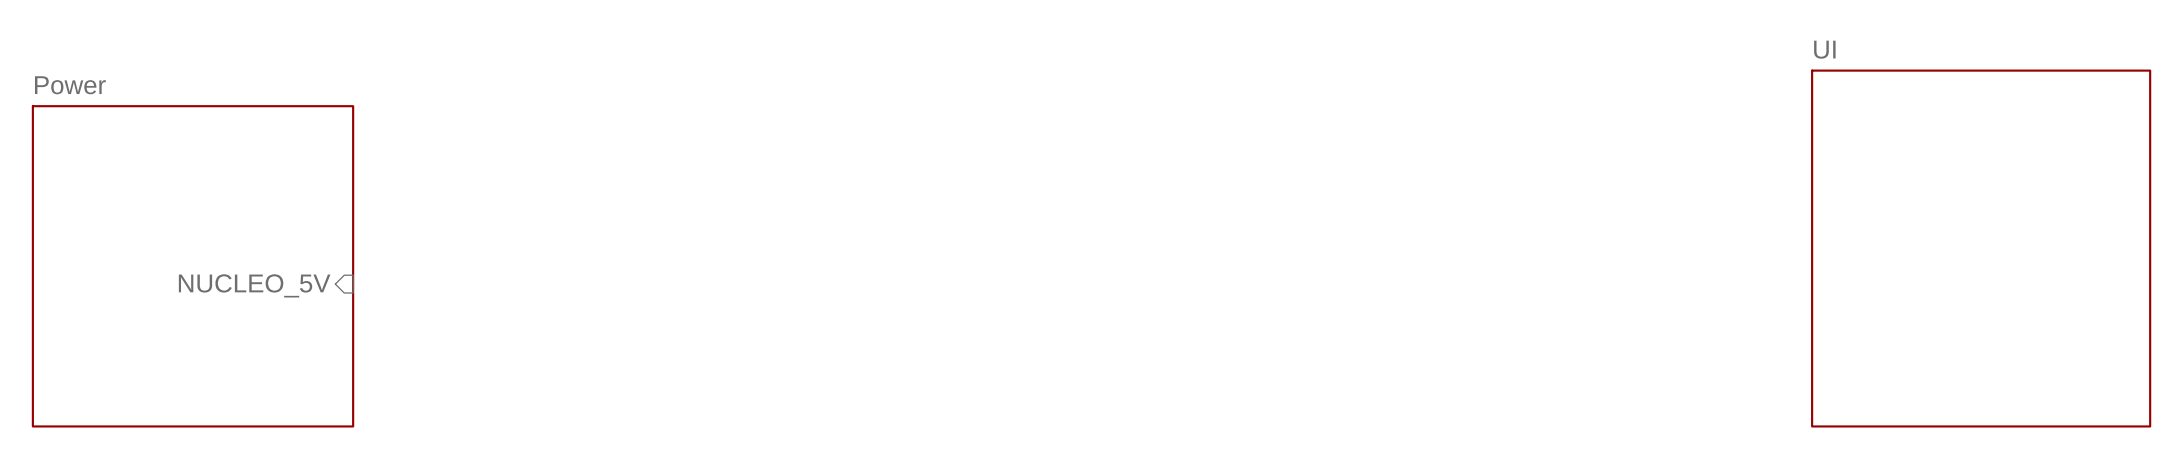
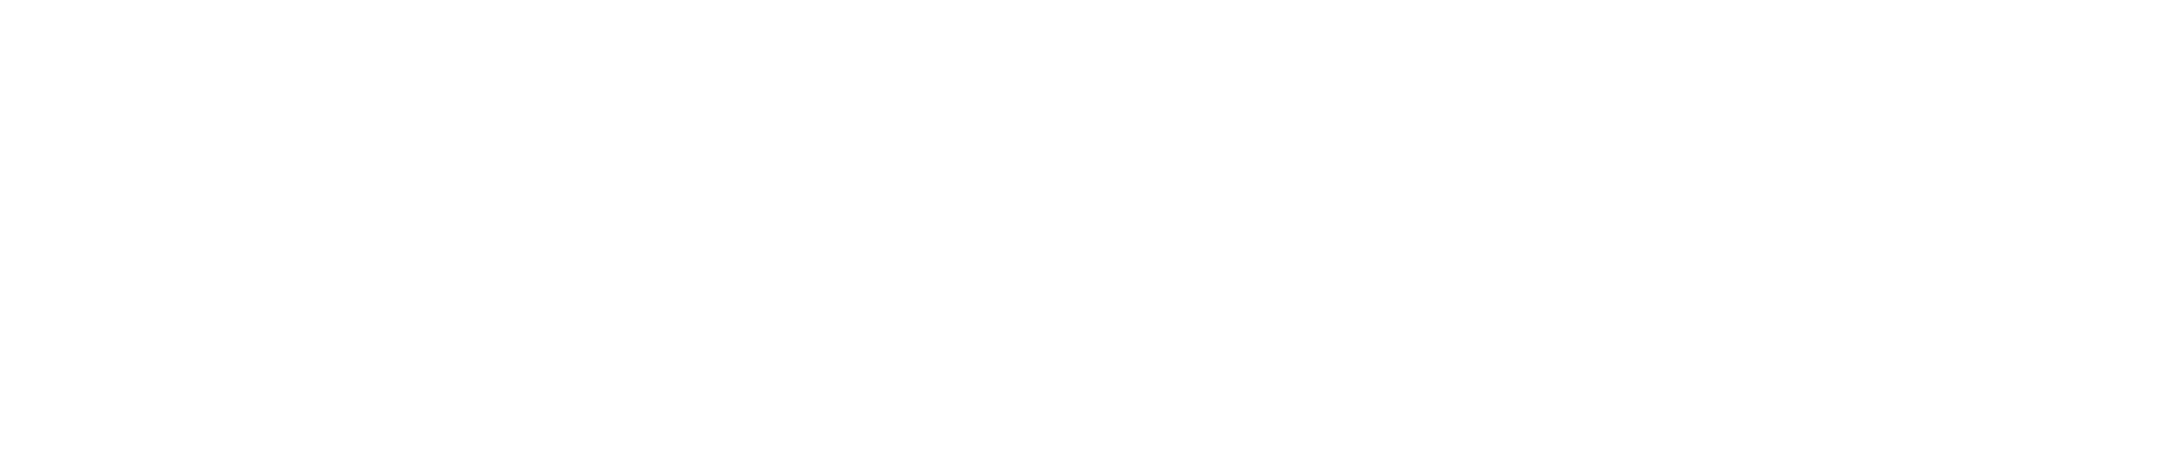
sheet UI: (1981, 248) -> none
sheet Power: (193, 266) -> none
sheet pin: NUCLEO_5V (254, 285) -> none

